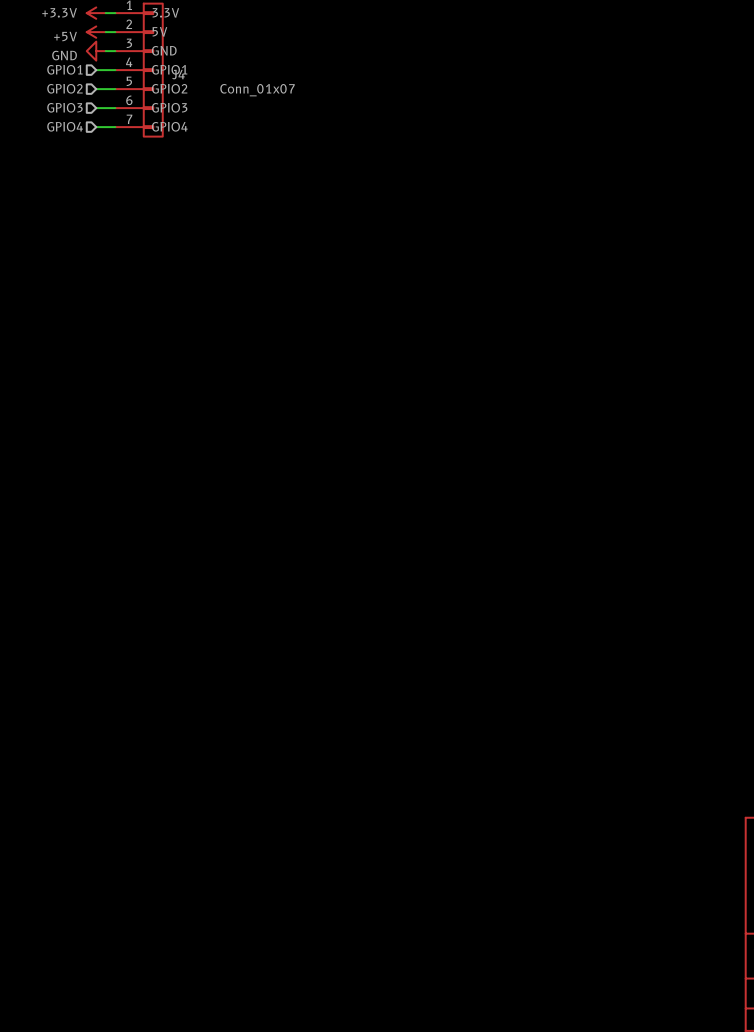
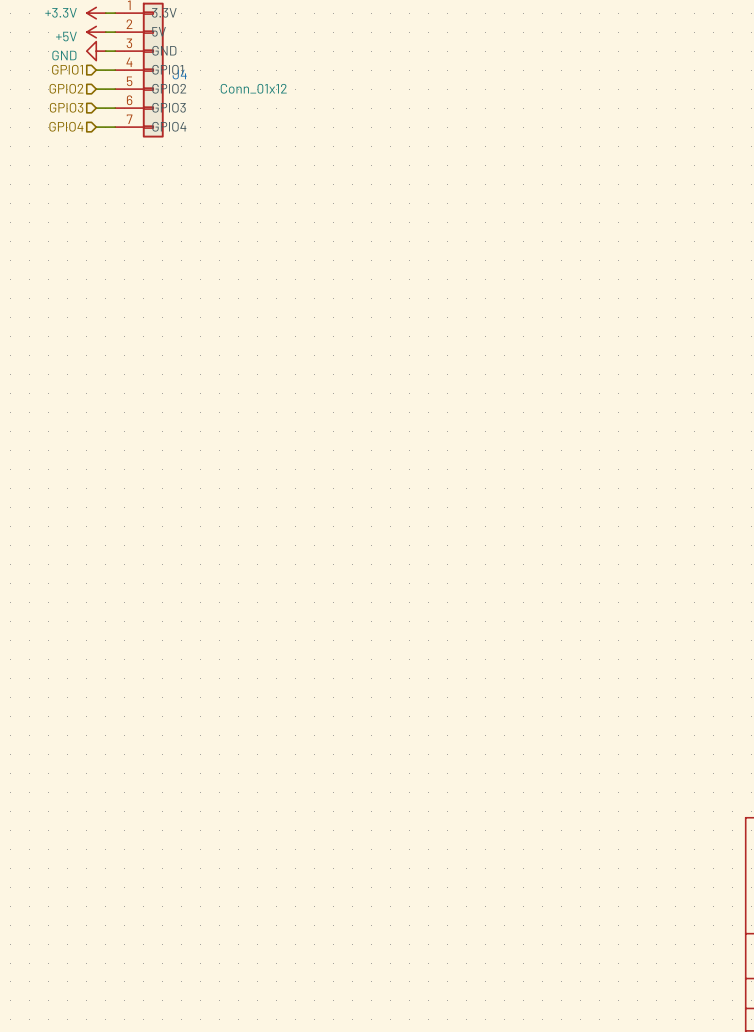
J4 value: Conn_01x07 (257, 90) -> Conn_01x12 (253, 88)

